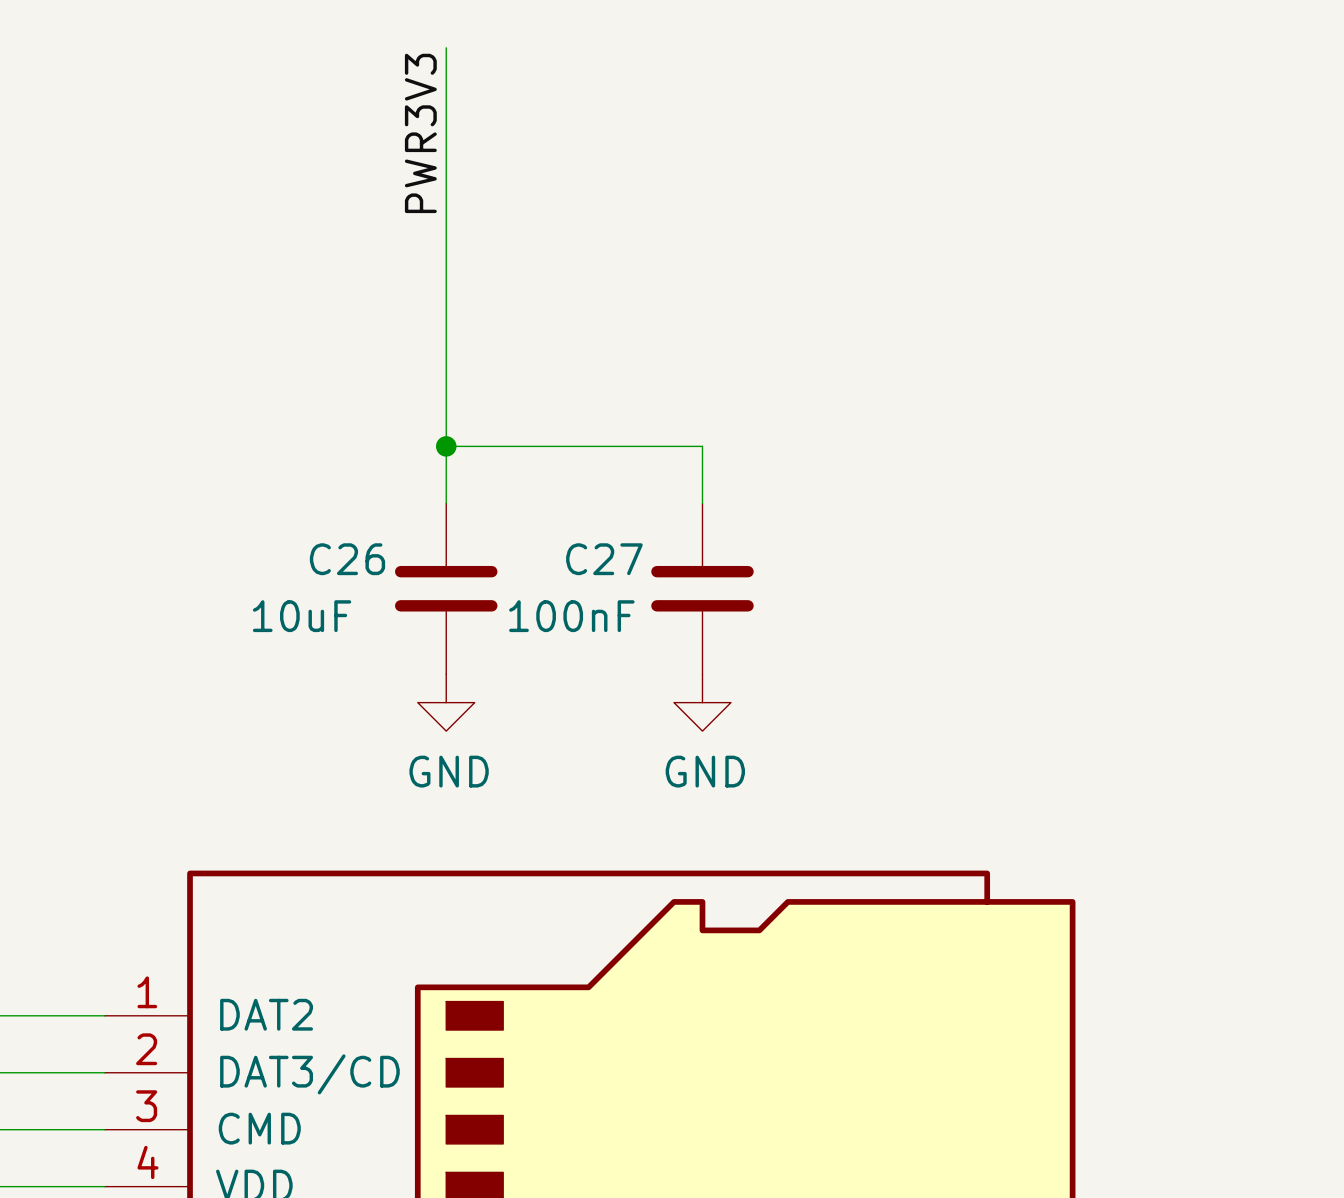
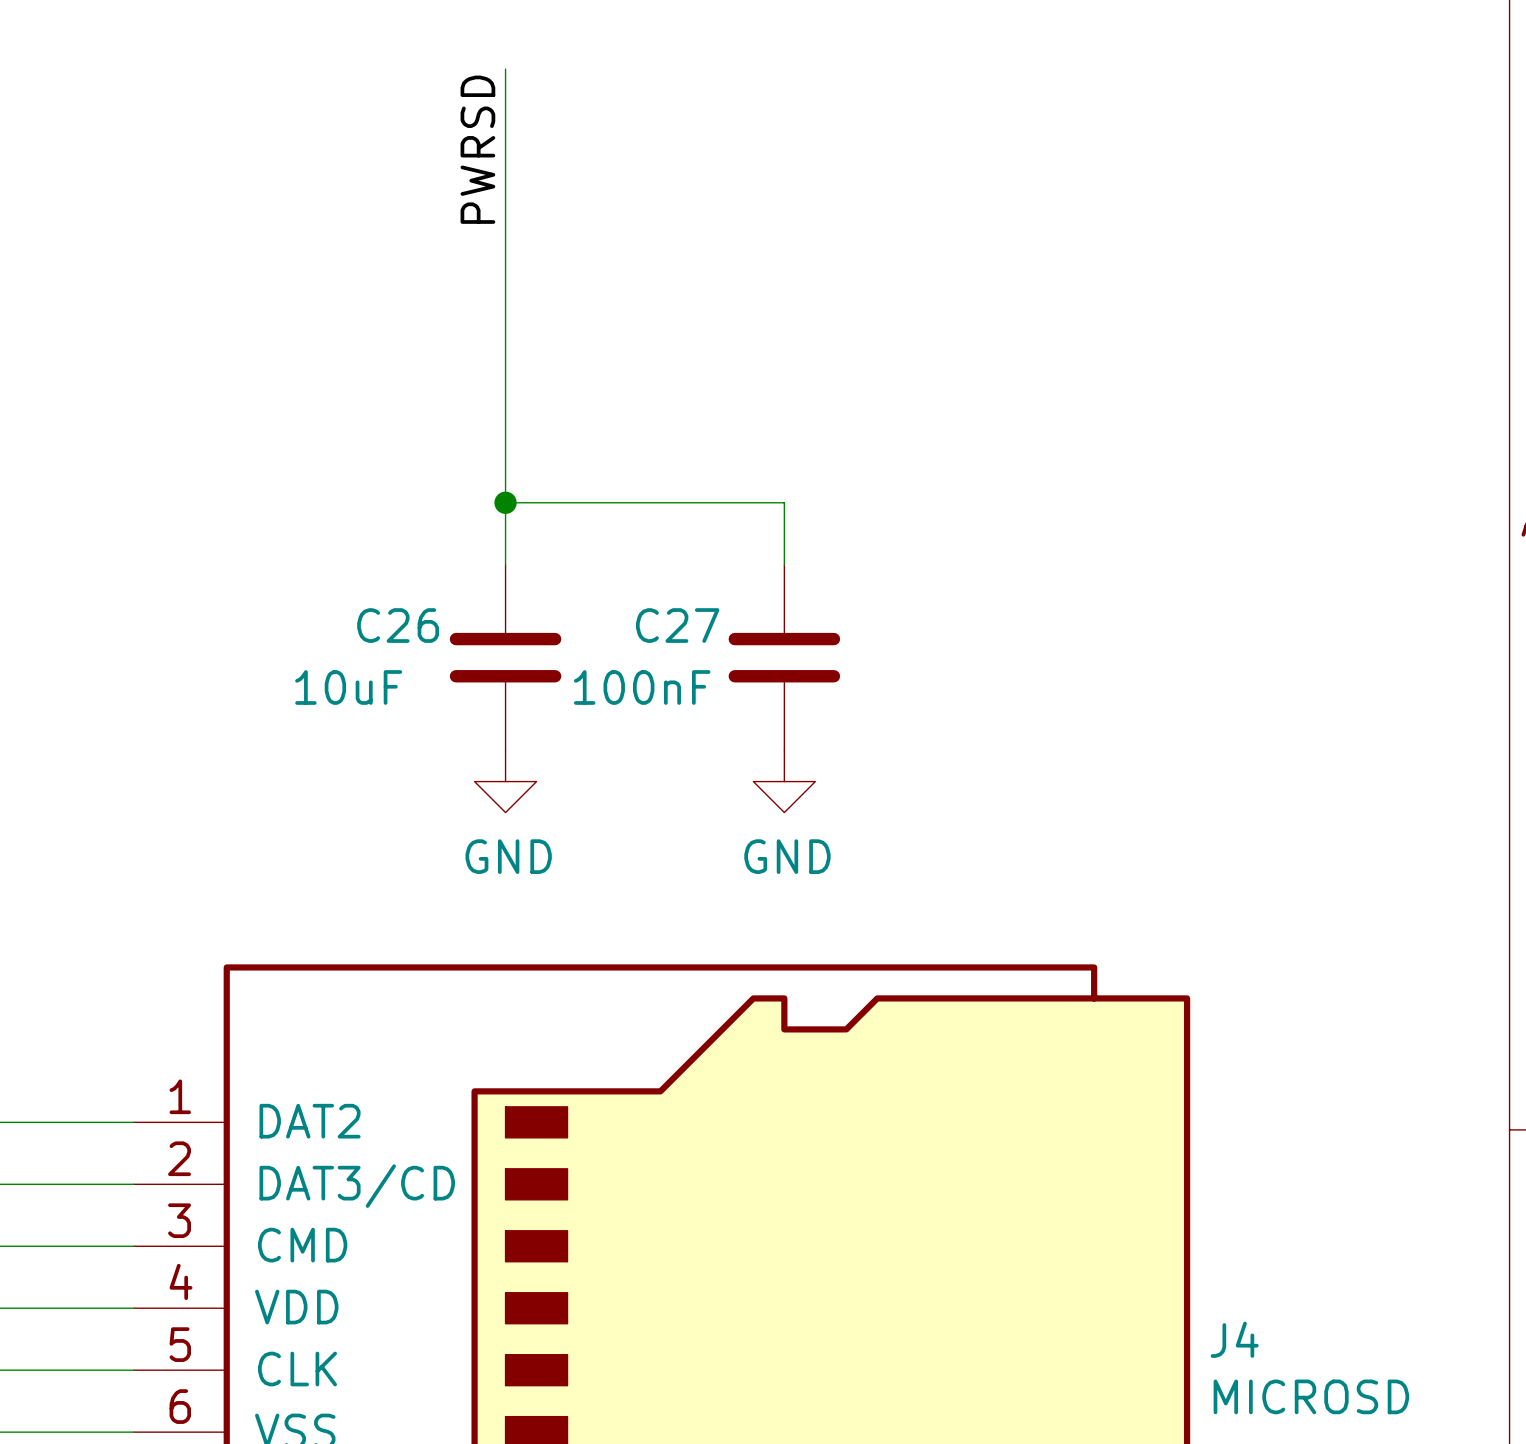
label: PWR3V3 (420, 133) -> PWRSD (477, 149)

